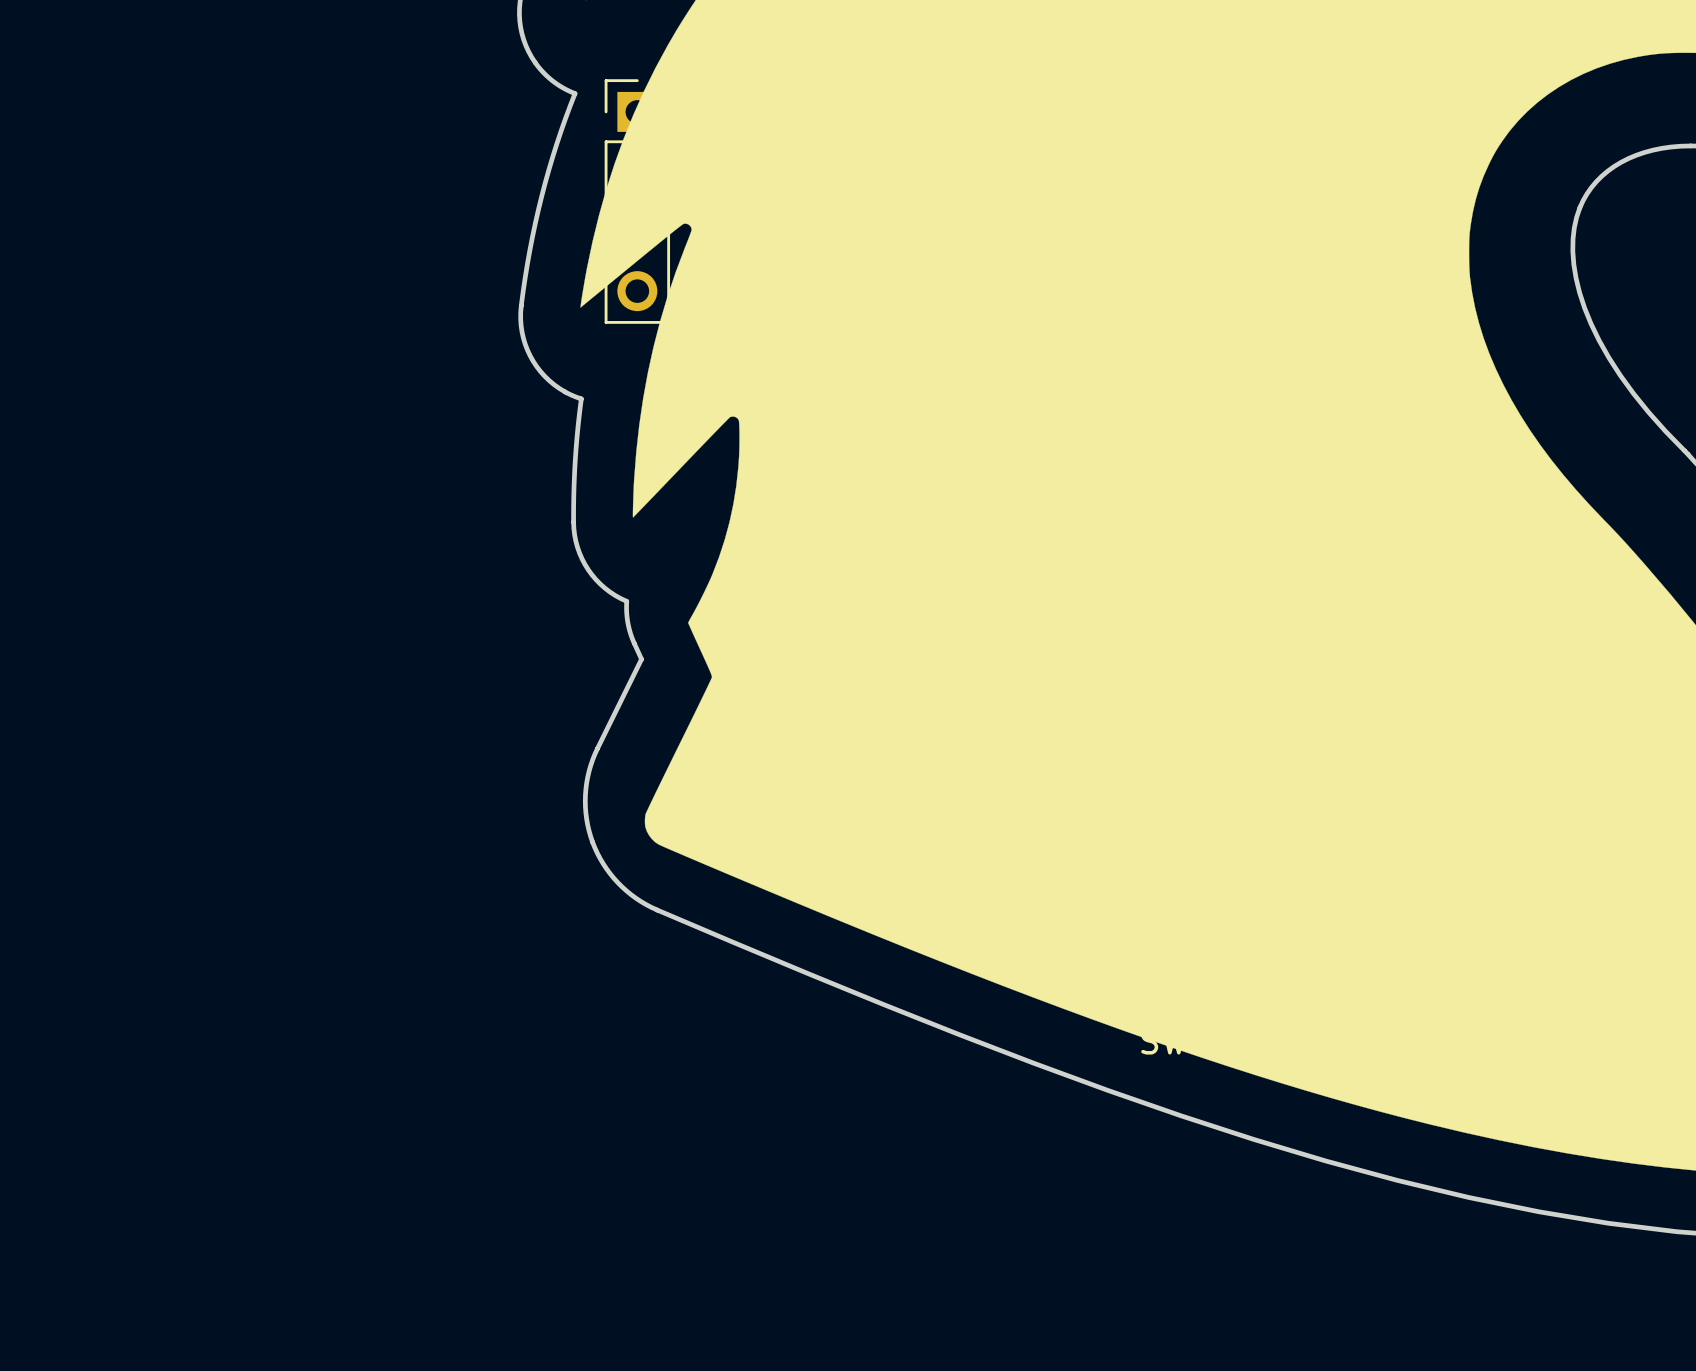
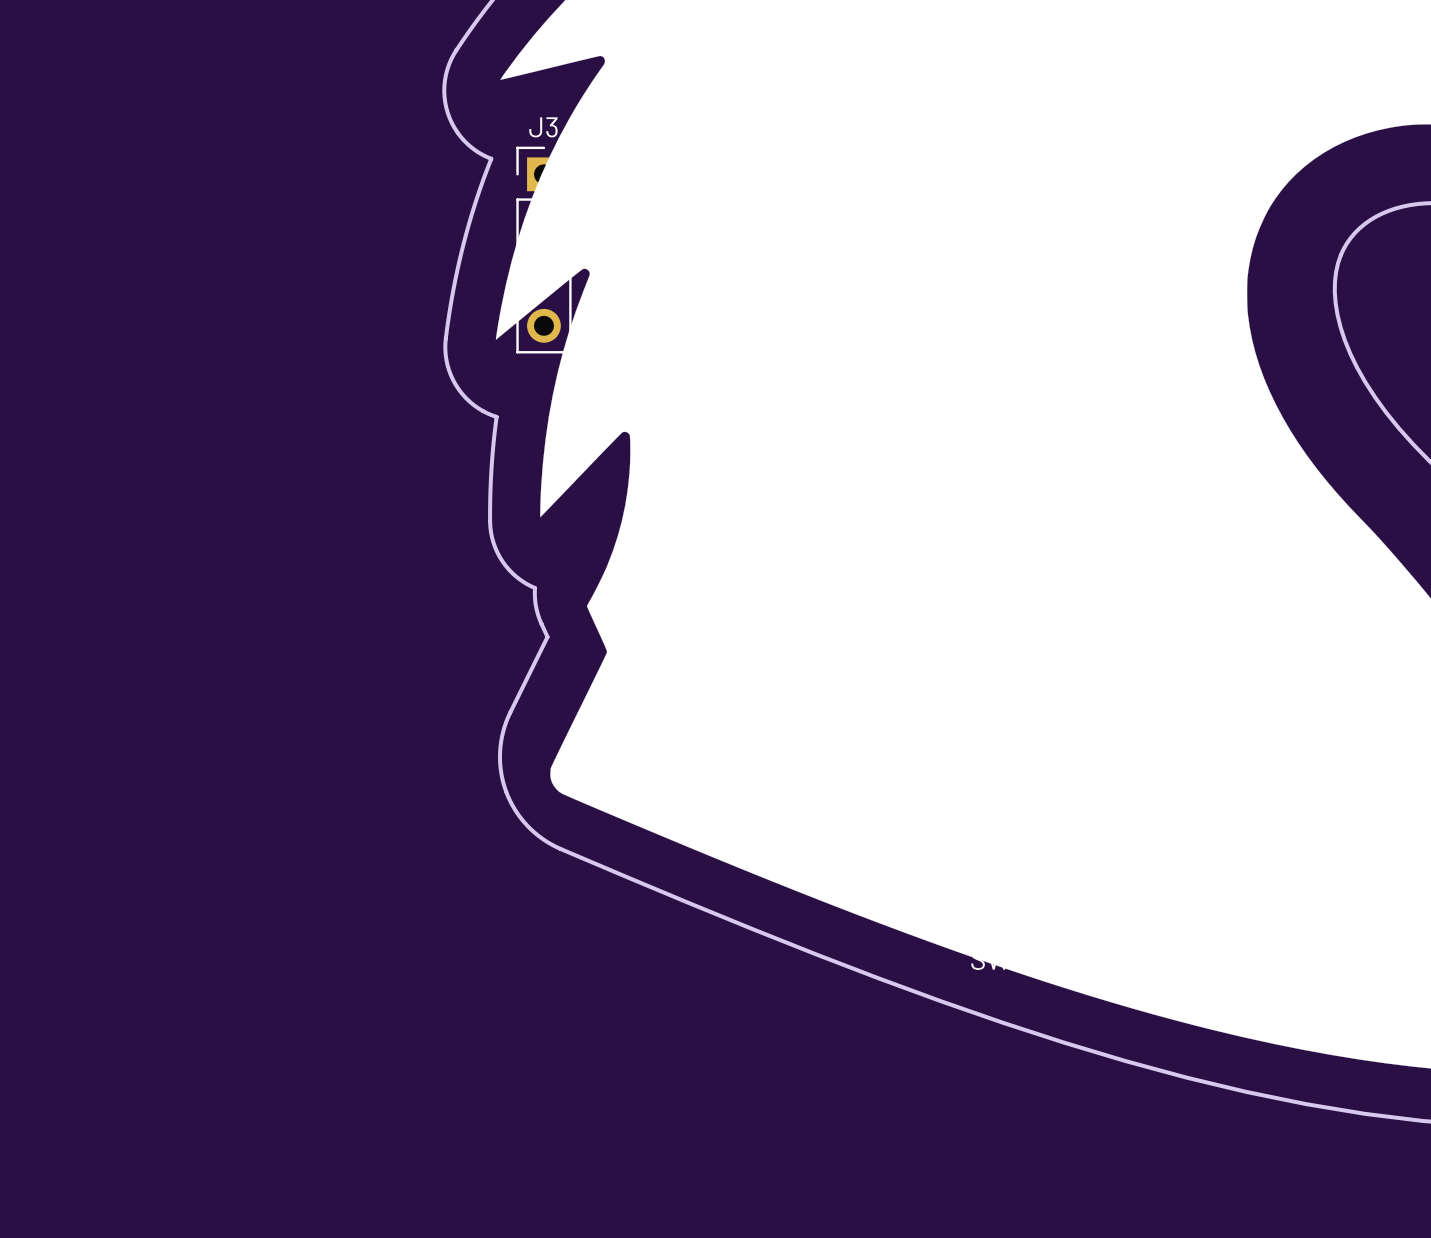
J3 name: none -> J3 (543, 127)

